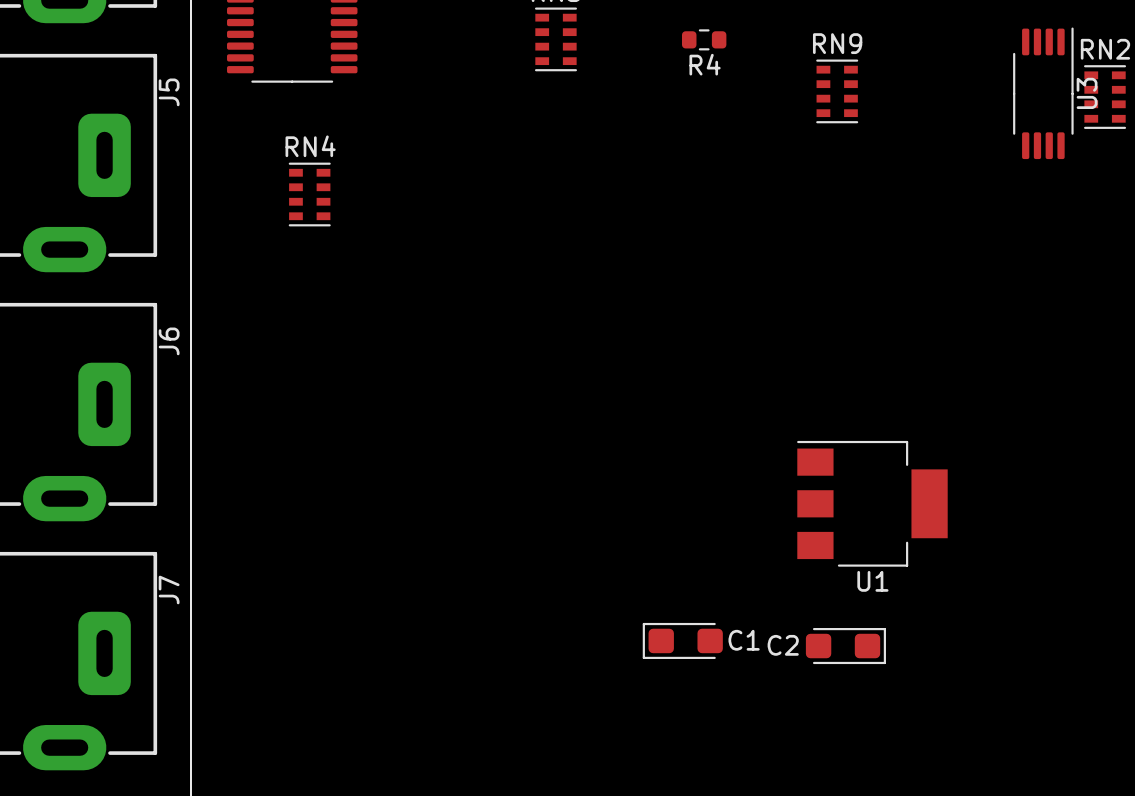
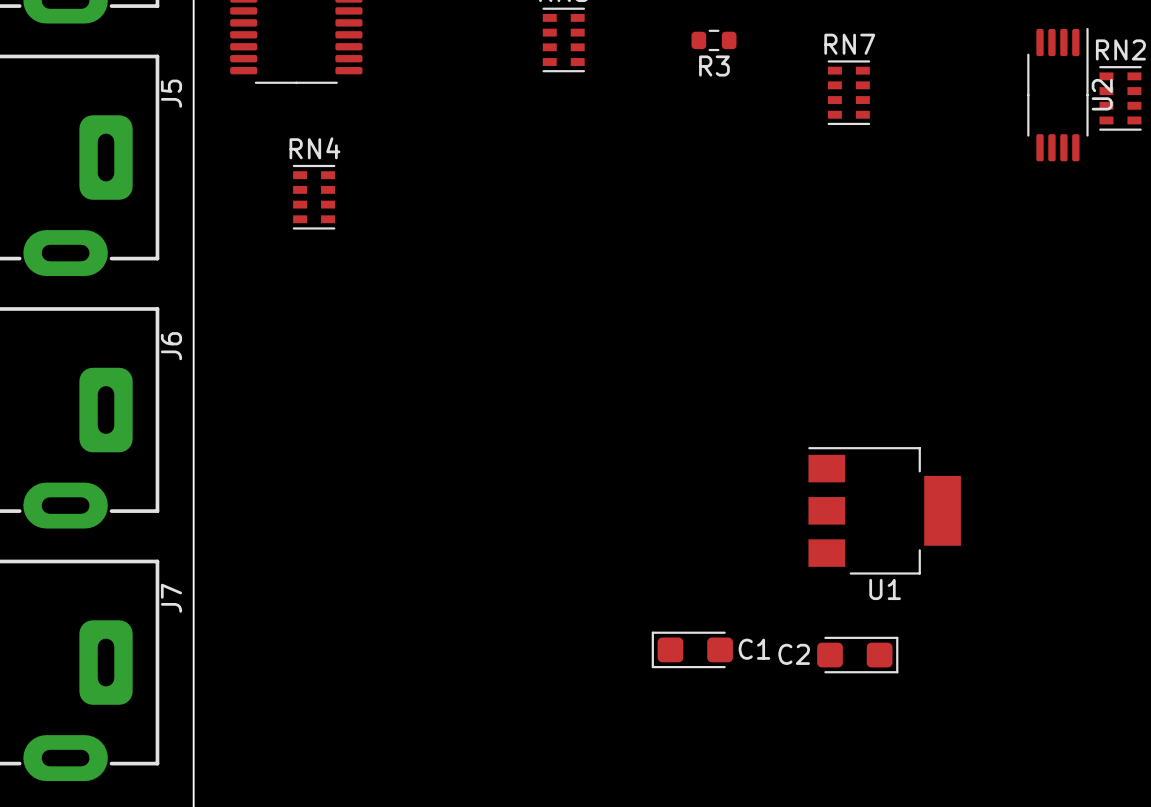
RN9 name: RN9 (837, 43) -> RN7 (849, 44)
R4 name: R4 (705, 64) -> R3 (714, 66)
U3 name: U3 (1087, 93) -> U2 (1102, 94)

